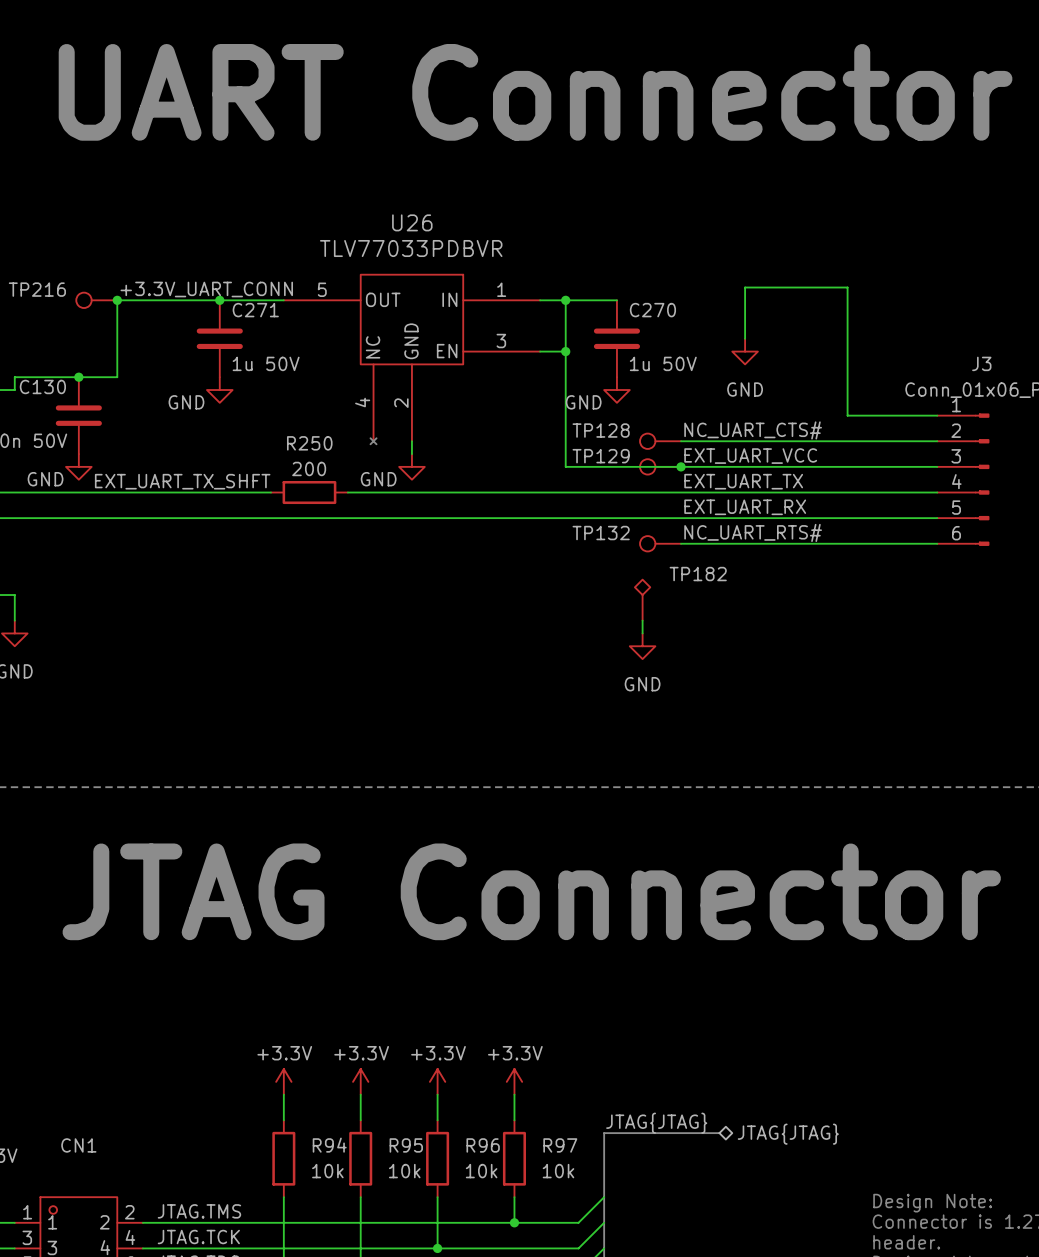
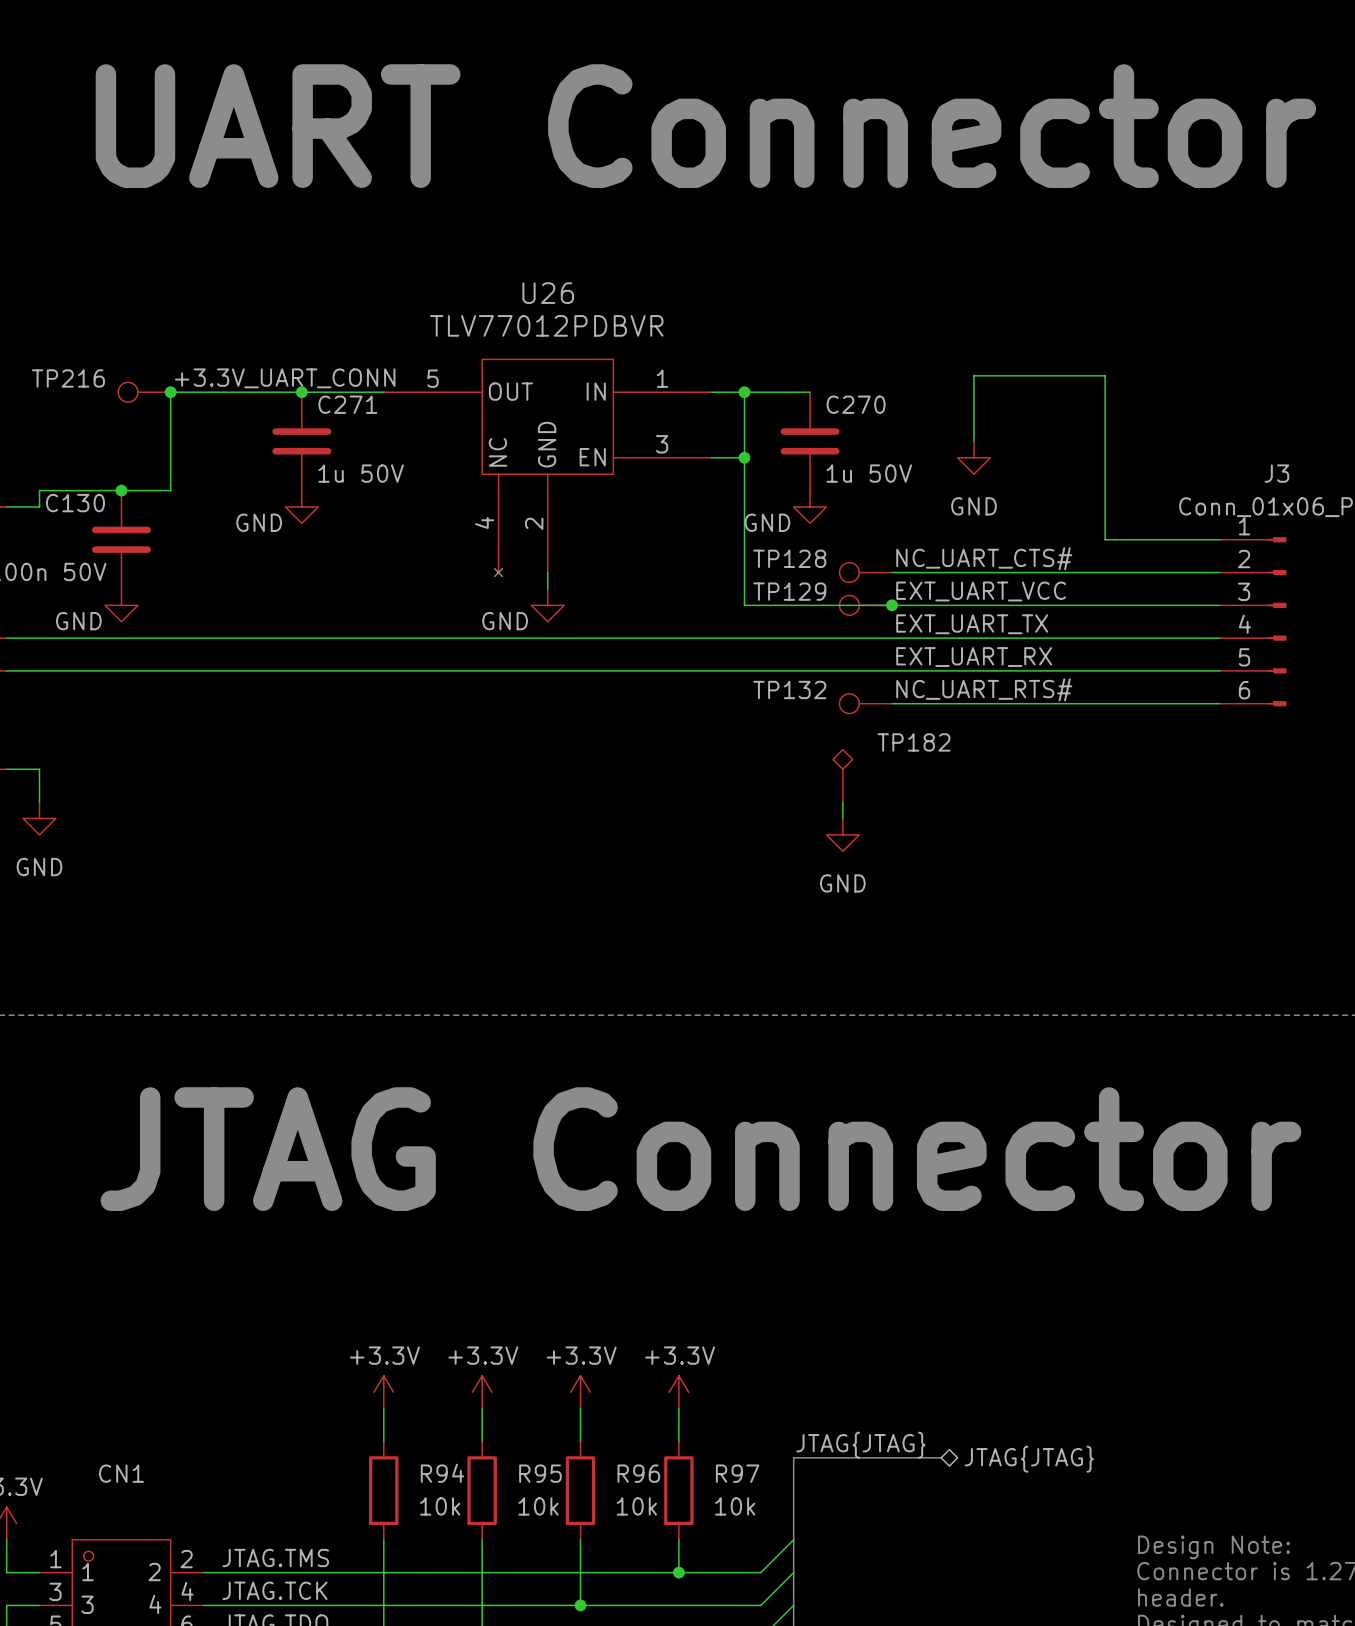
U26 value: TLV77033PDBVR (411, 248) -> TLV77012PDBVR (546, 325)
label: EXT_UART_TX_SHFT (182, 481) -> none
wire: none -> (367, 638) (465, 638)
R250: 200 (309, 492) -> none

